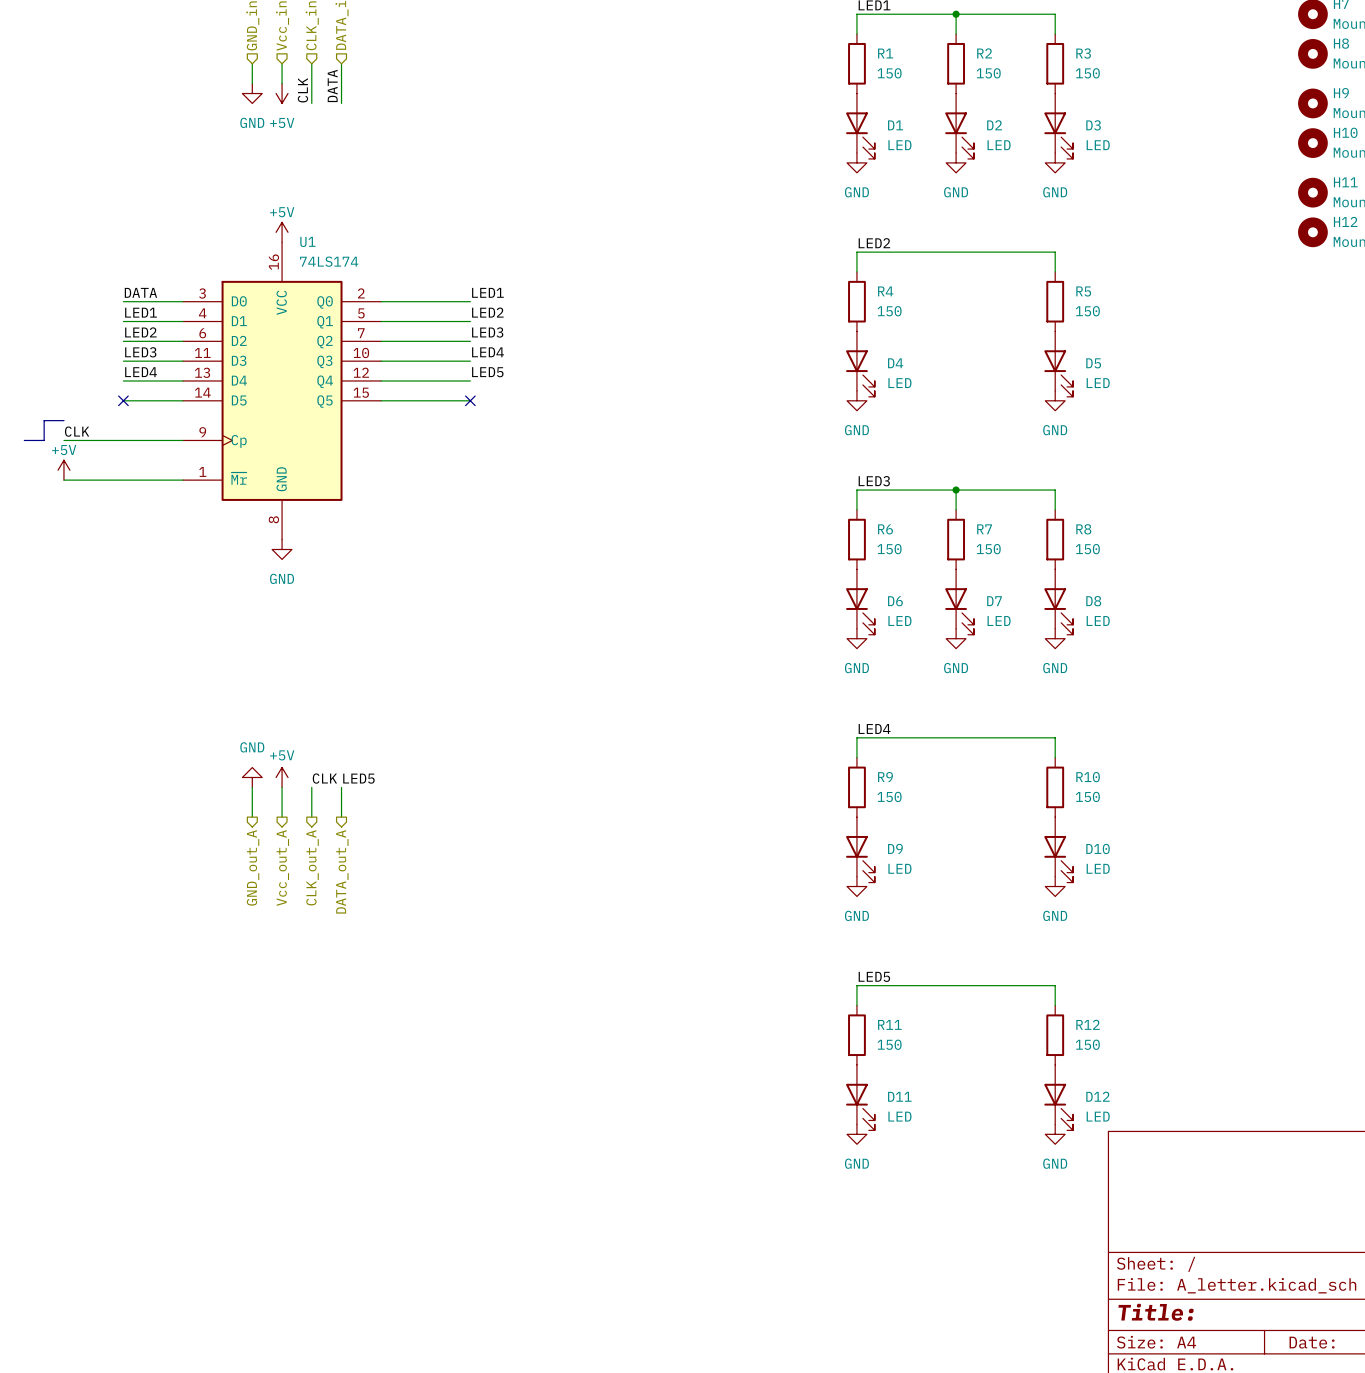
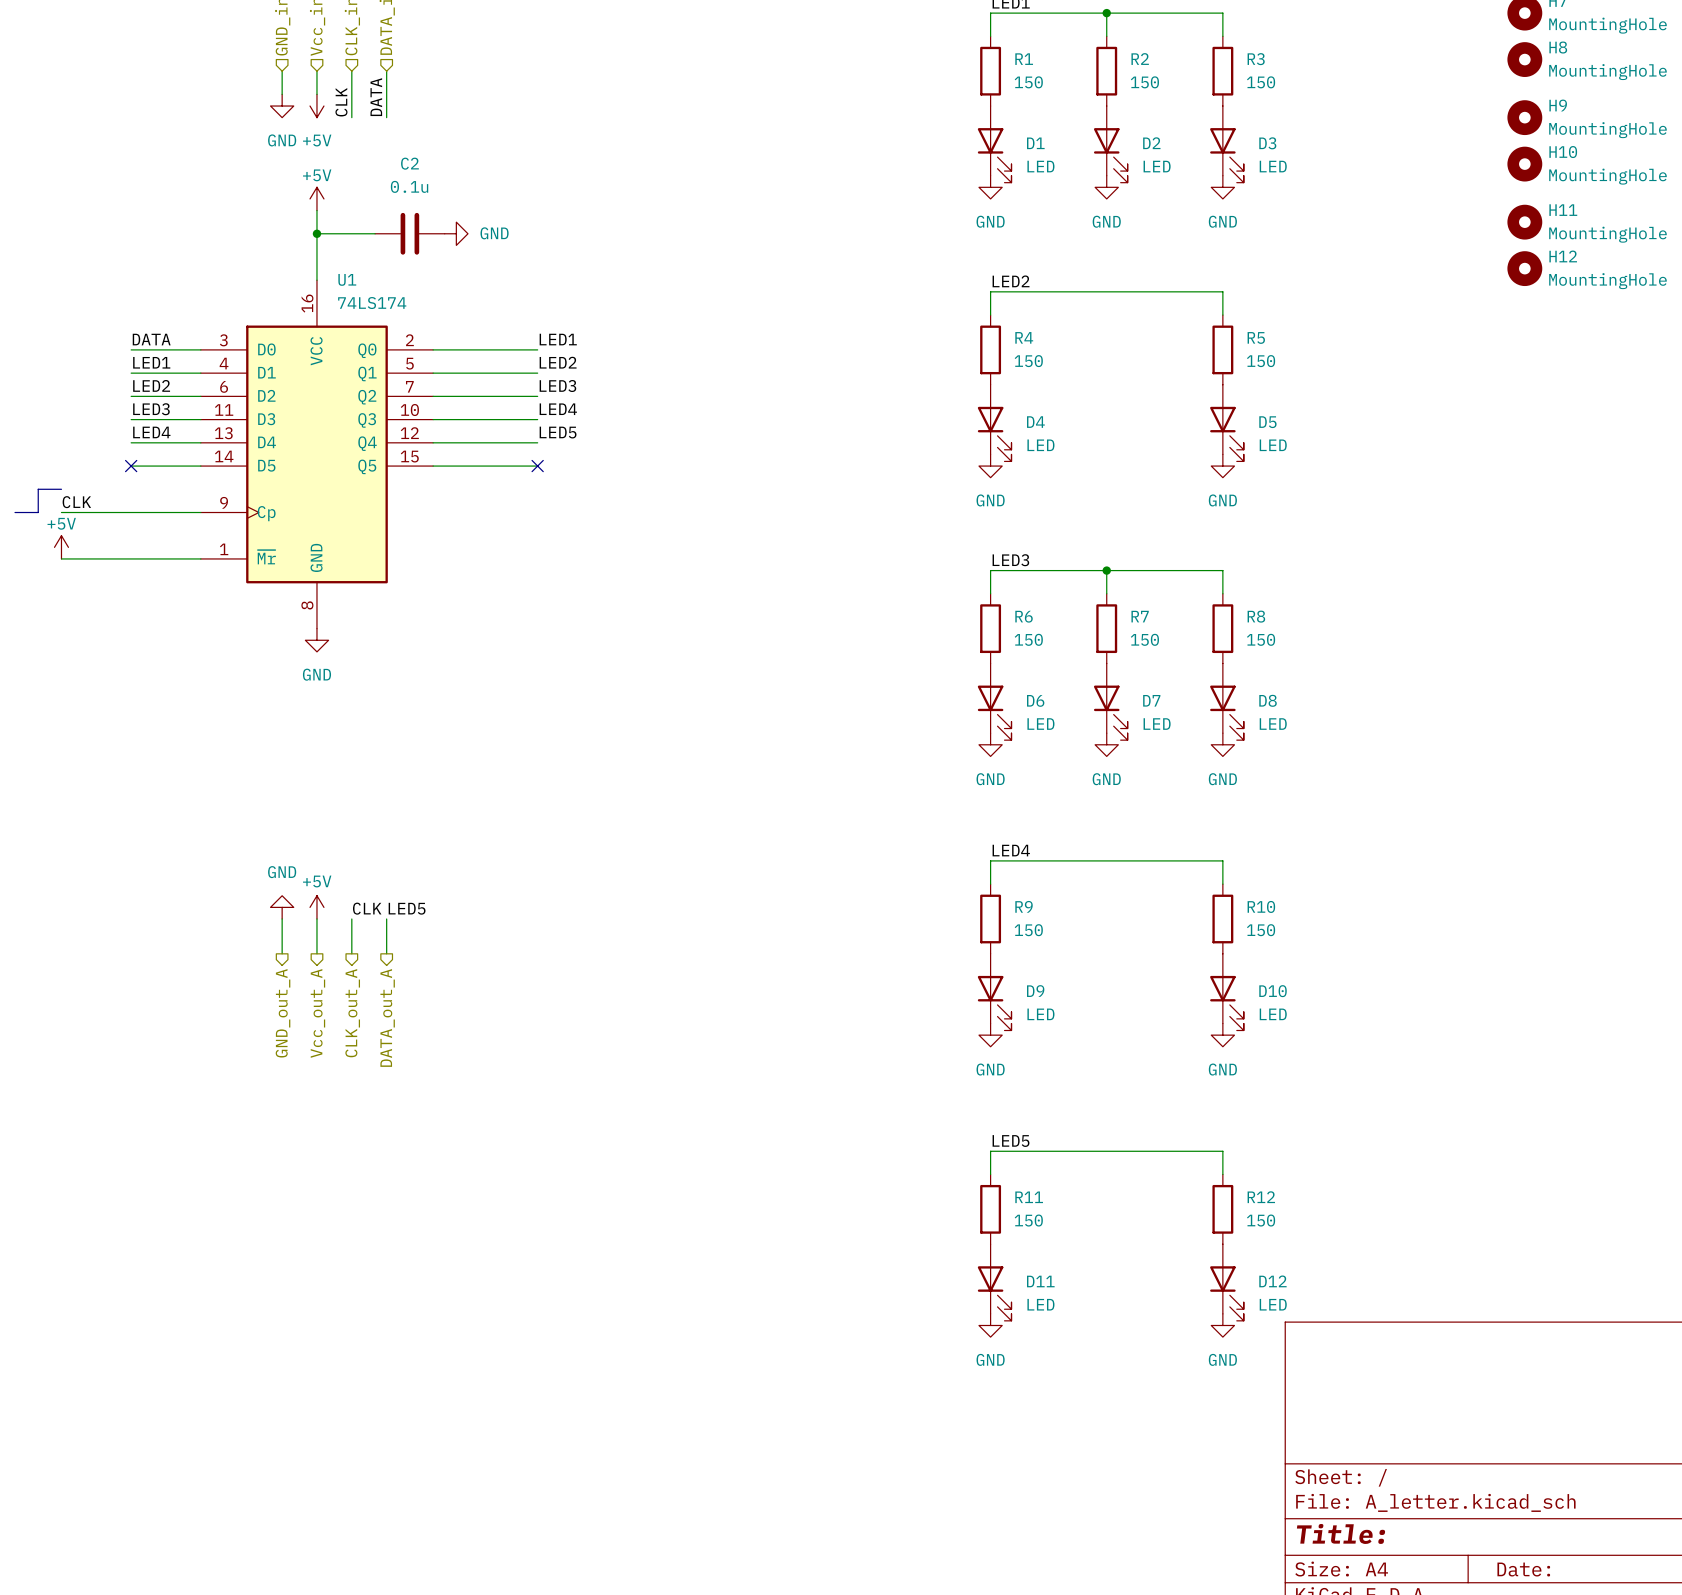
wire: none -> (316, 210) (316, 280)
wire: none -> (316, 233) (375, 233)
junction: none -> (316, 233)
C2: none -> 0.1u (409, 233)
power symbol: none -> GND (456, 233)
power symbol position: +5V (282, 232) -> +5V (316, 198)

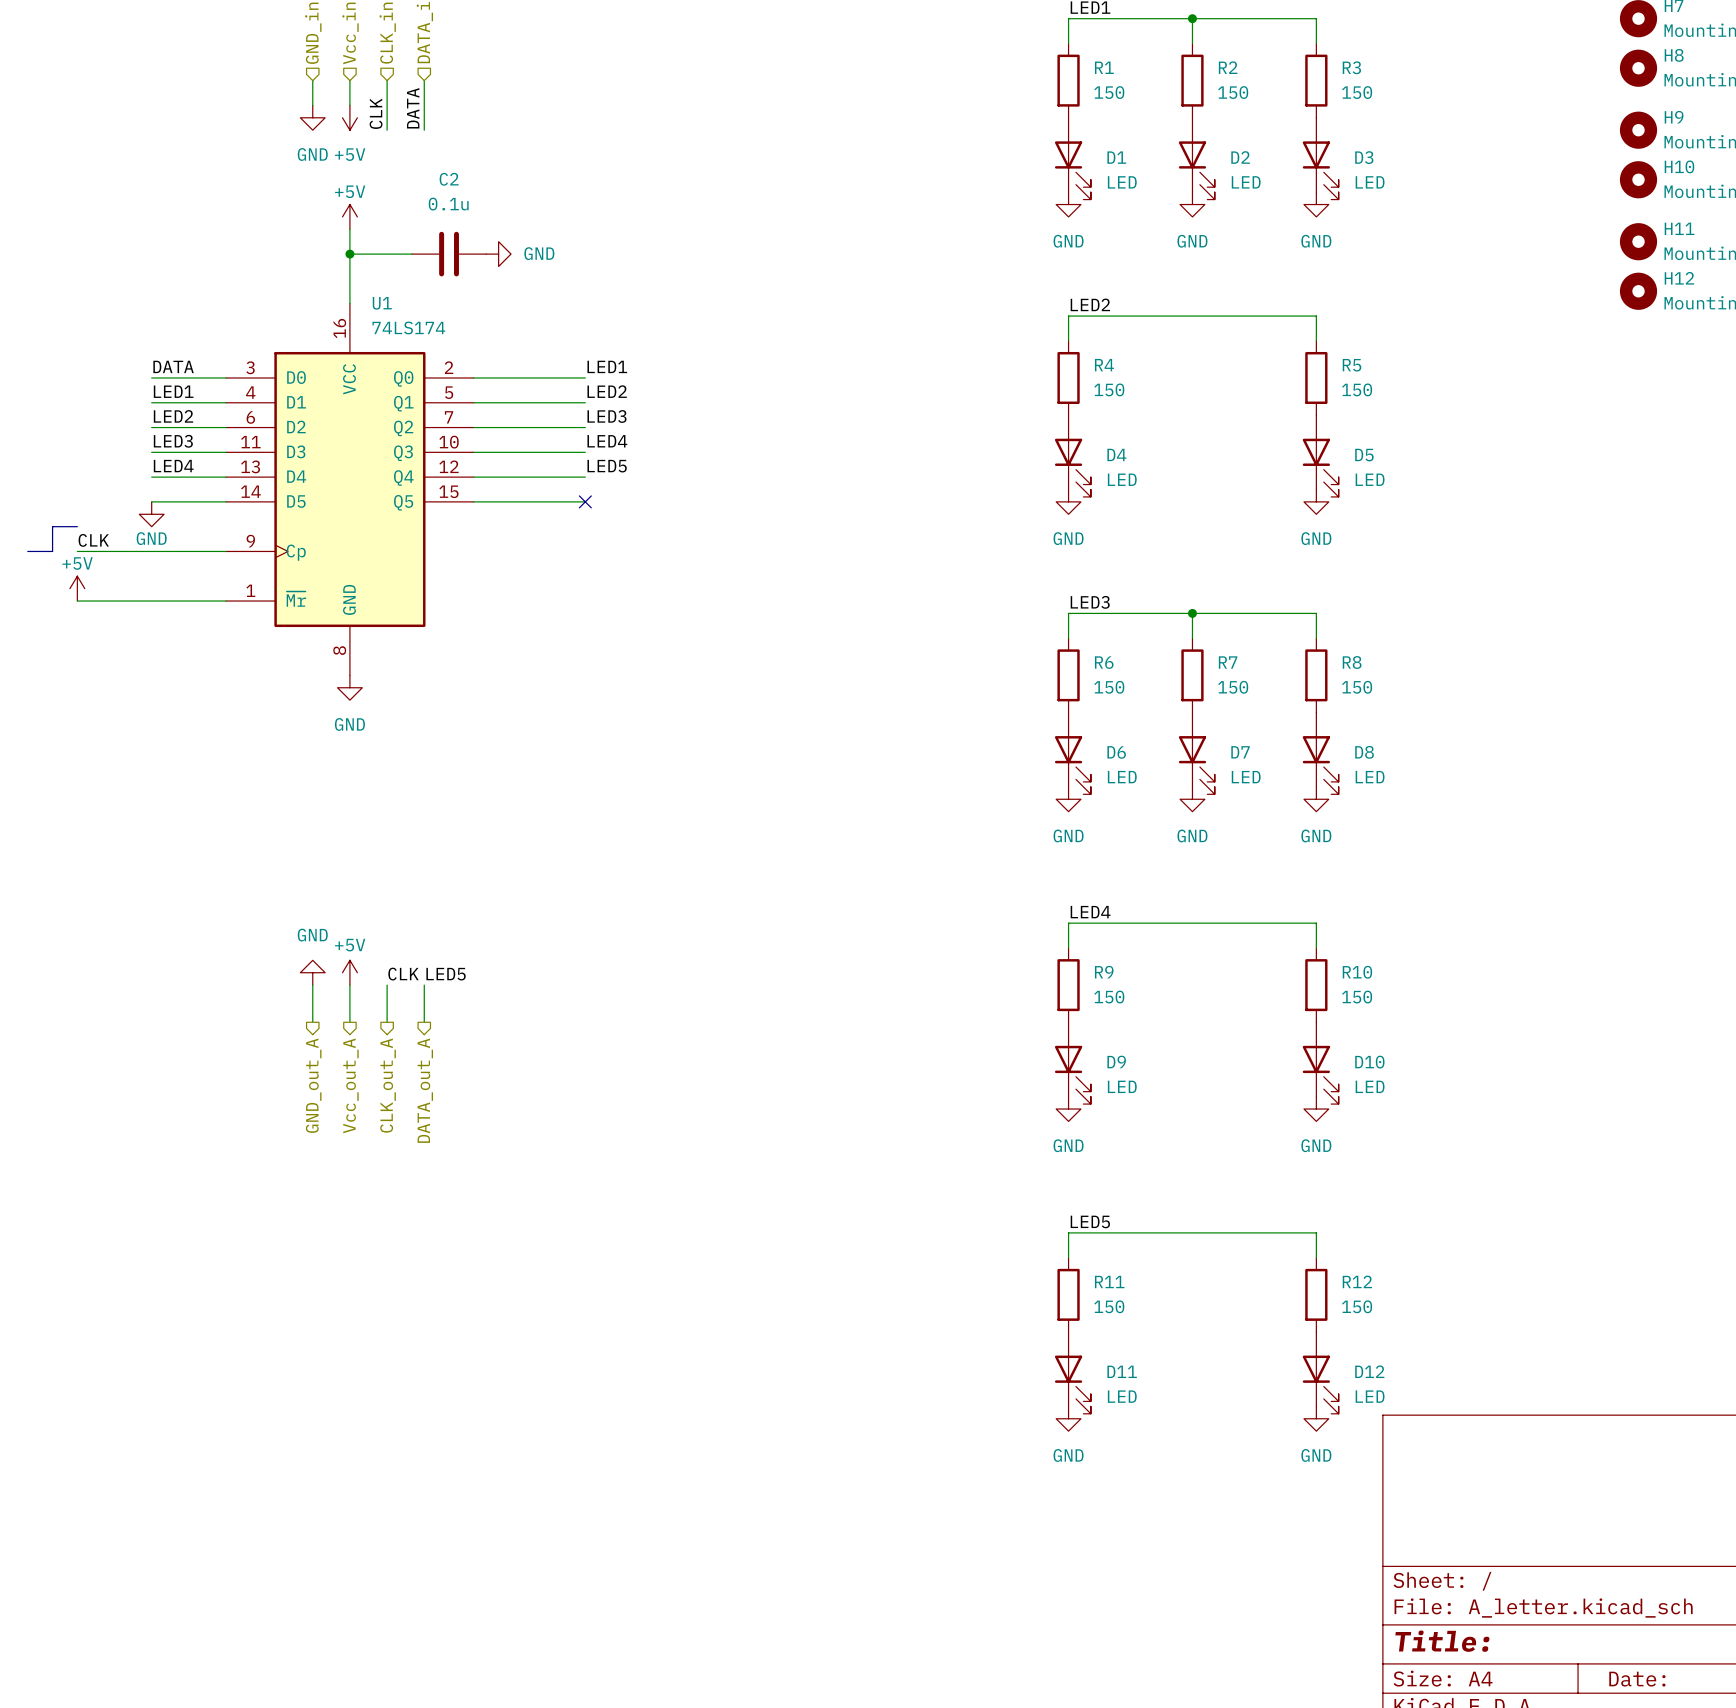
no-connect mark: (131, 466) -> none
power symbol: none -> GND (151, 514)

